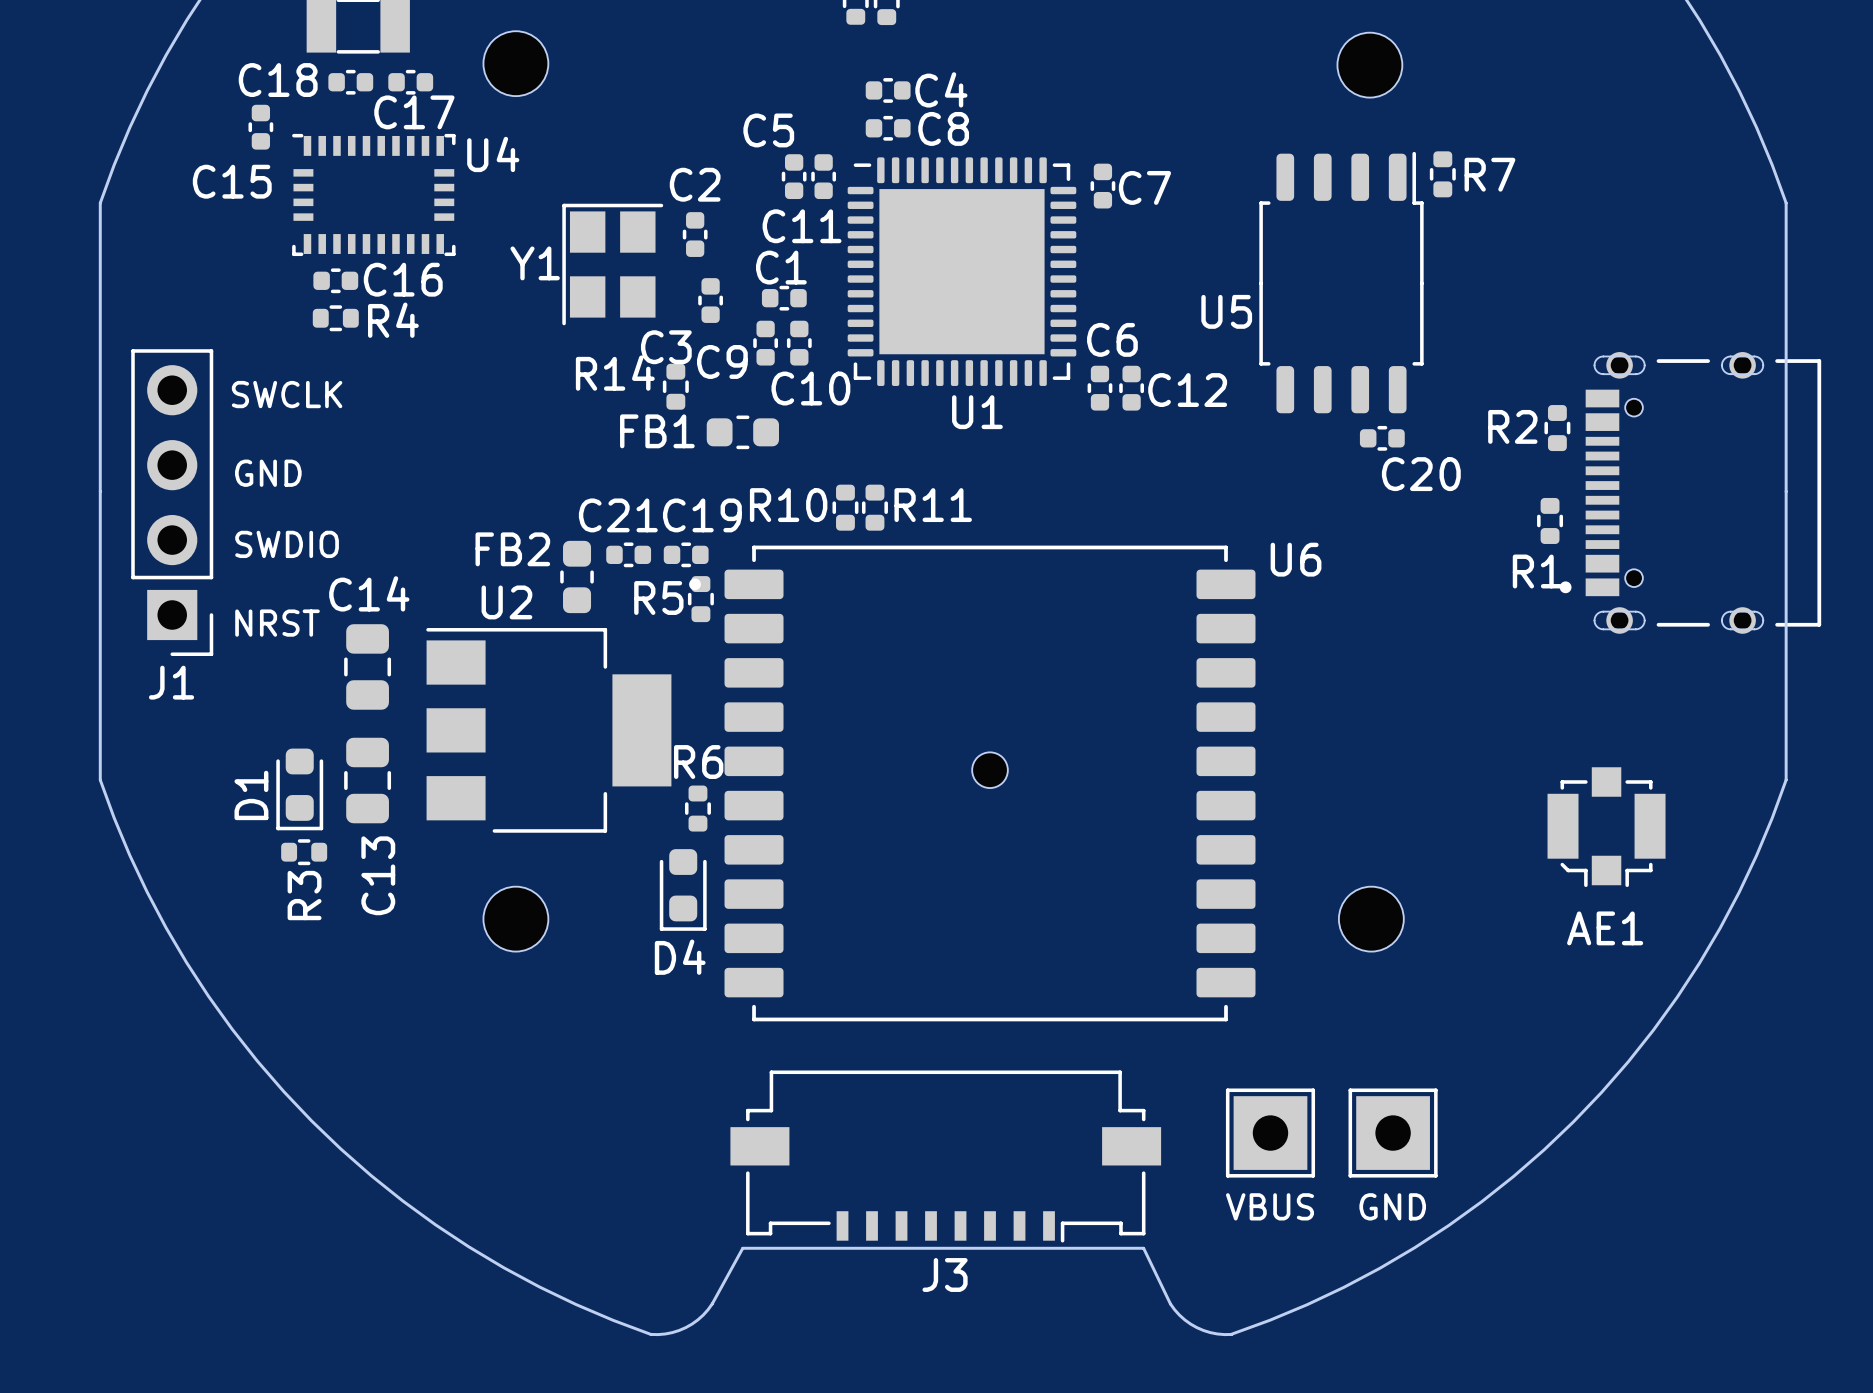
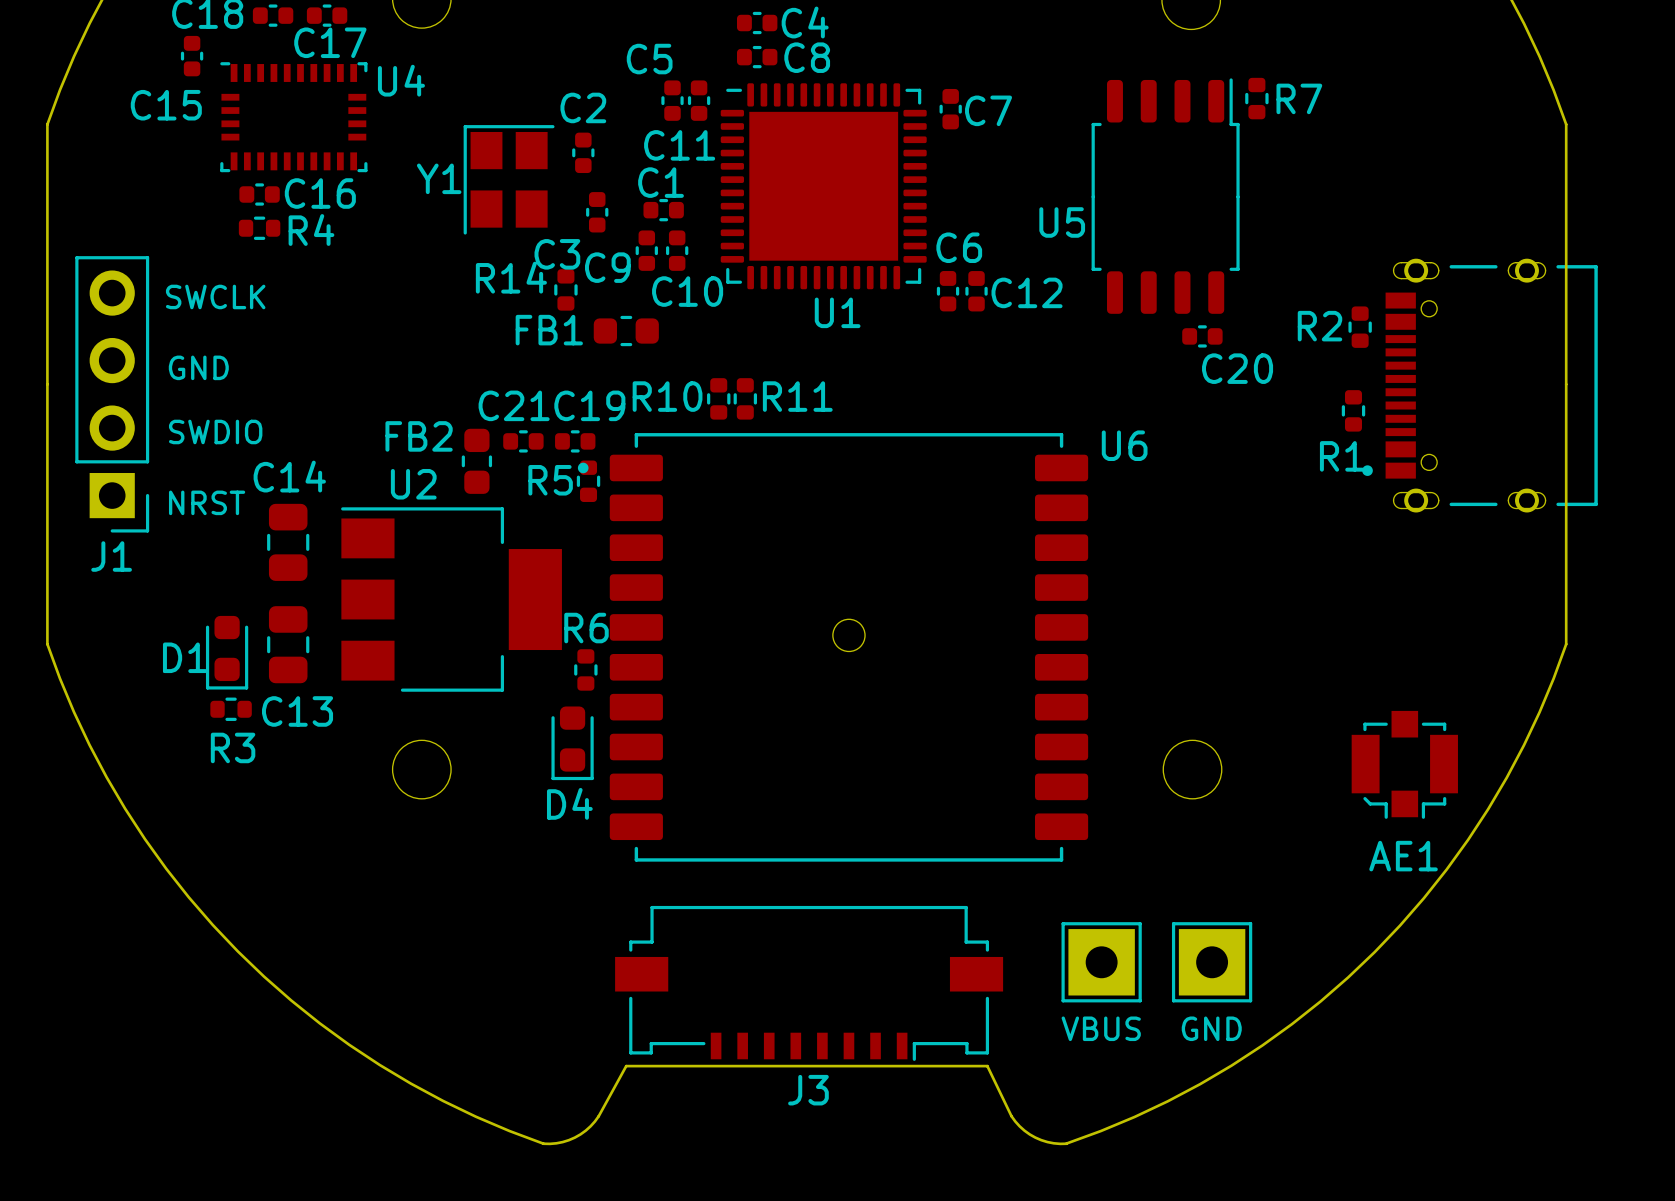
D1 name rotation: 0° (251, 795) -> 90° clockwise (185, 657)
AE1 position: (1606, 827) -> (1404, 764)
C13 name rotation: 0° (378, 875) -> 90° clockwise (297, 711)
R3 name rotation: 0° (304, 895) -> 90° clockwise (233, 747)

